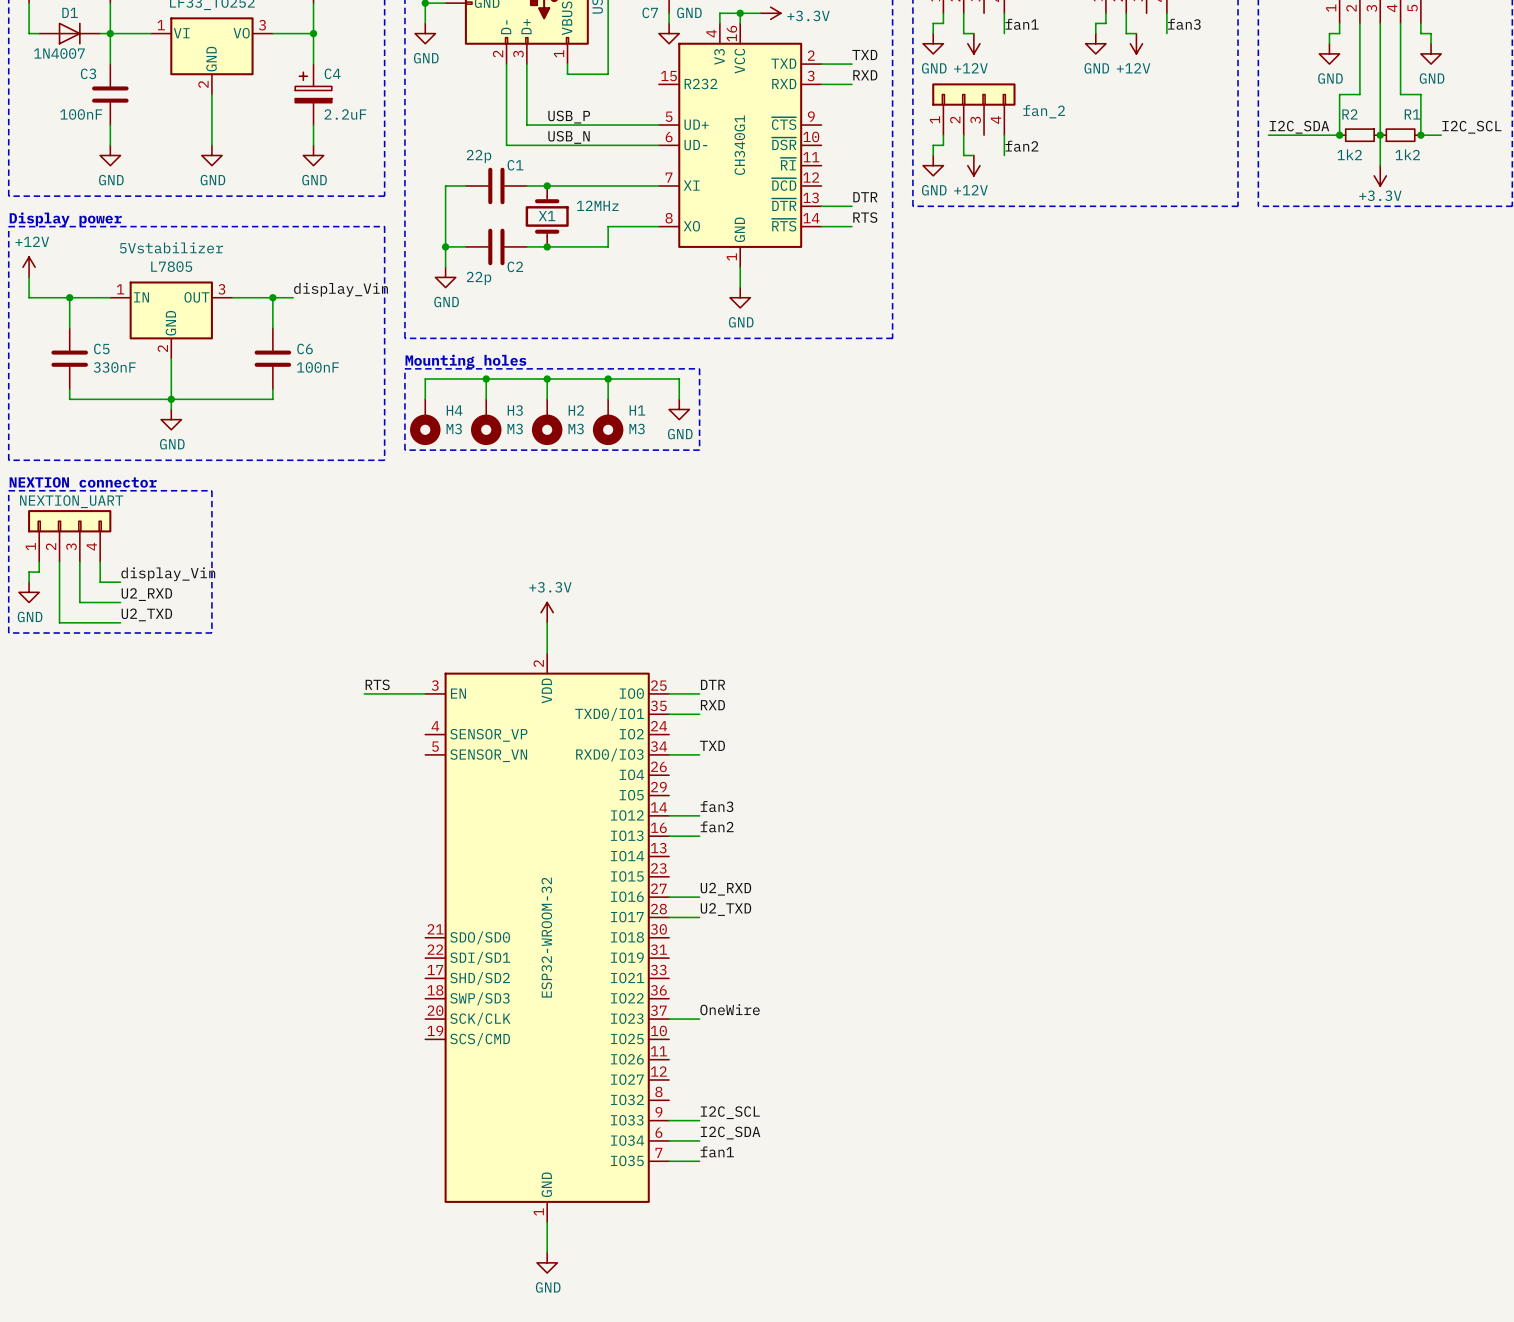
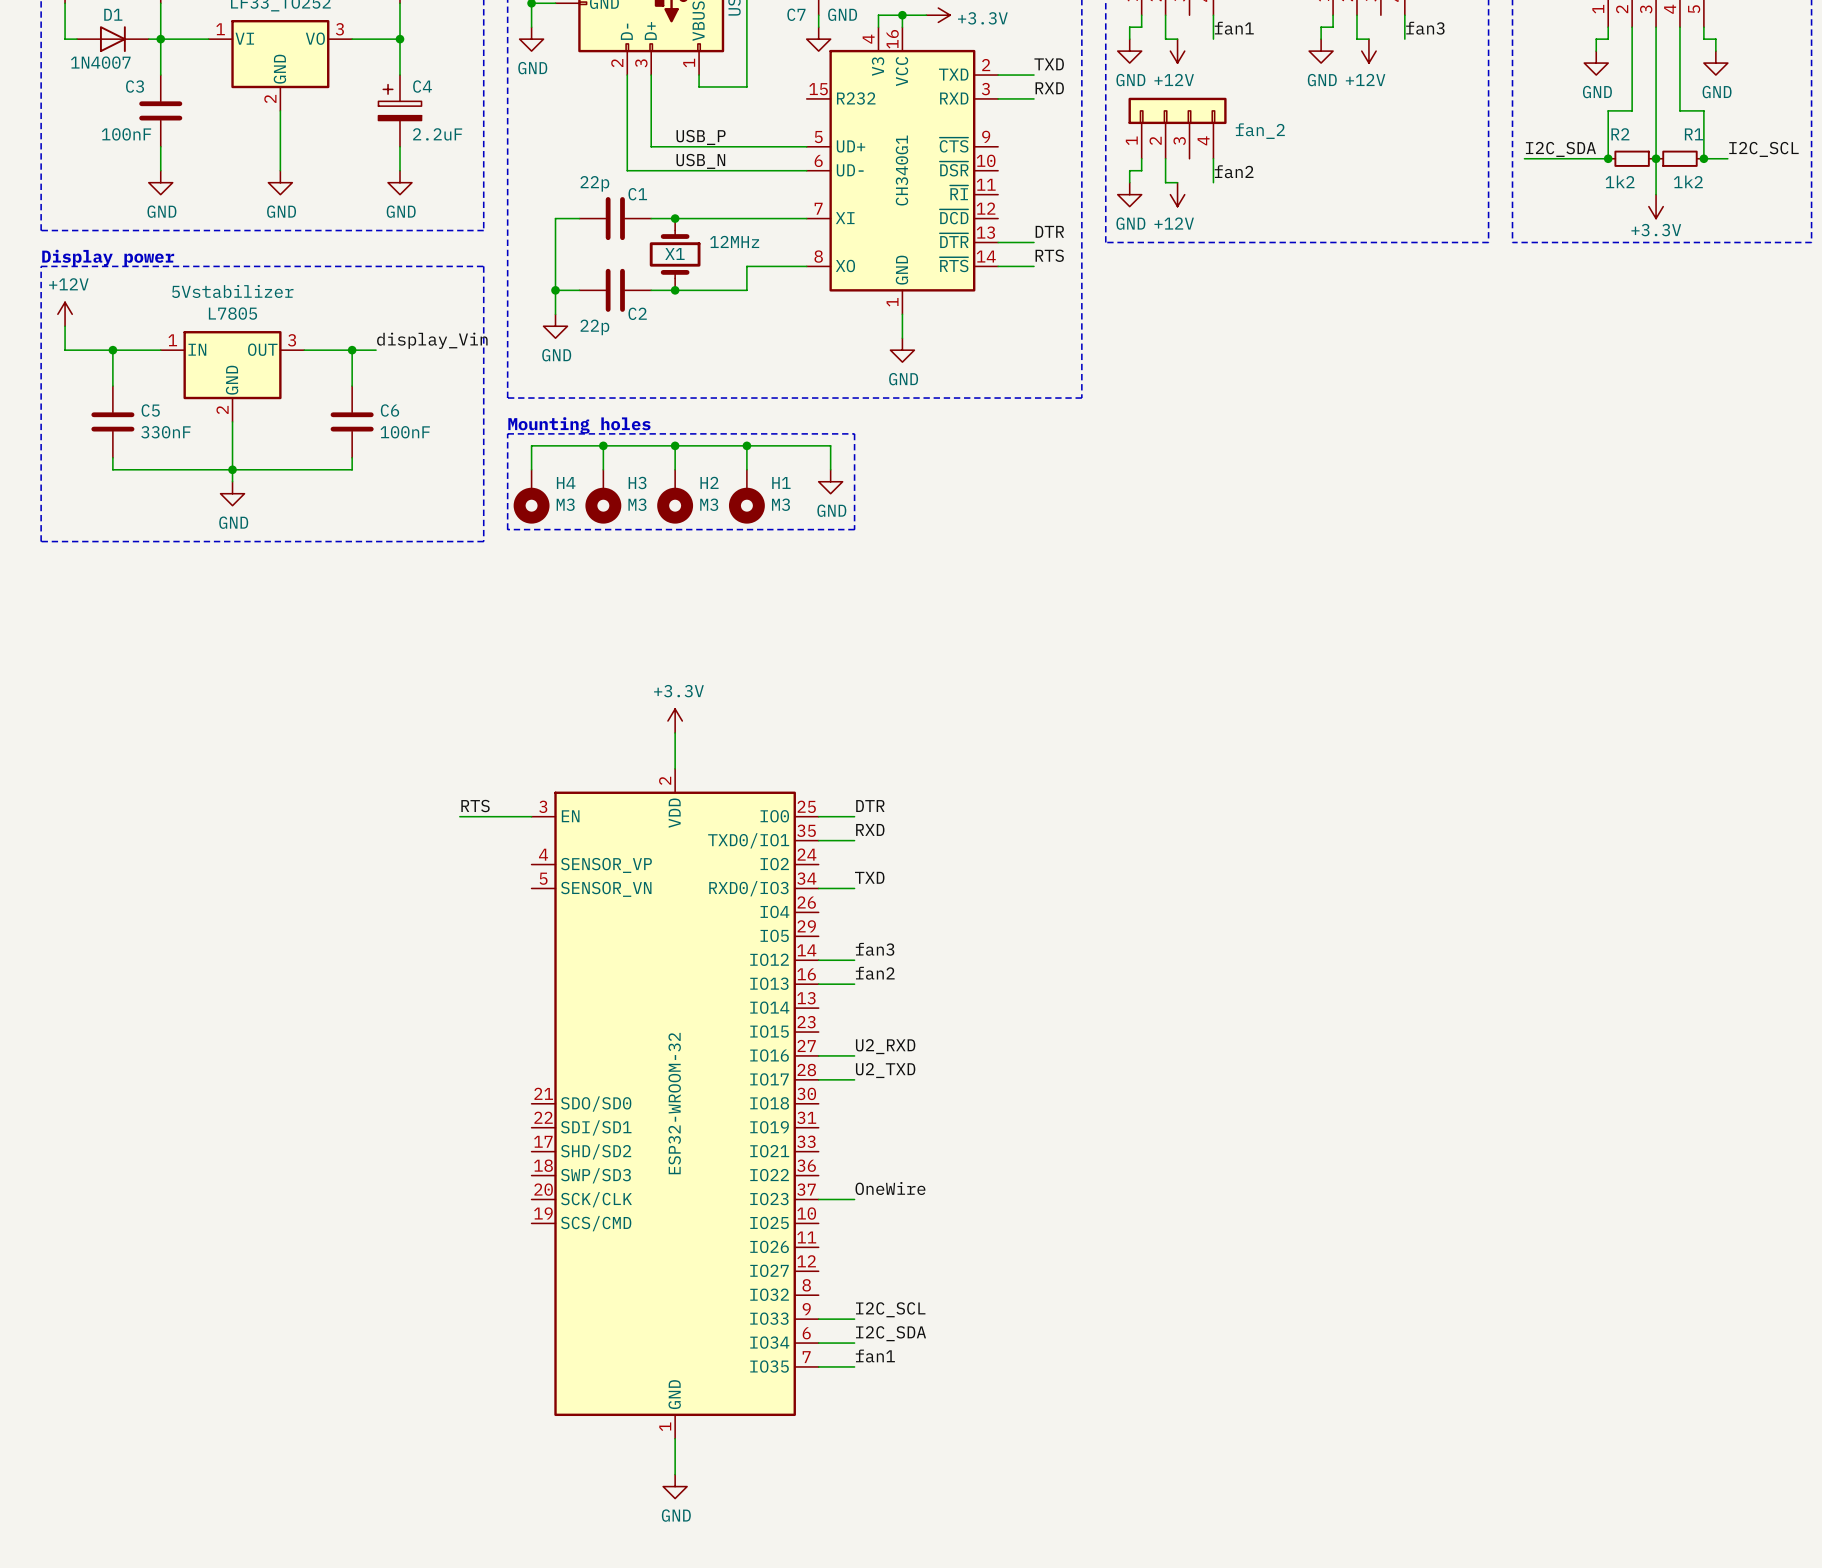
text: NEXTION connector (83, 482) -> none
line: (8, 490) (8, 632) (211, 632) (211, 490) (8, 490) -> none
NEXTION_UART: (69, 535) -> none
wire: (39, 561) (39, 572) (29, 572) (29, 582) -> none
wire: (59, 561) (59, 622) (120, 622) -> none
wire: (79, 561) (79, 602) (120, 602) -> none
wire: (100, 561) (100, 582) (120, 582) -> none
label: display_Vin (168, 574) -> none
power symbol: GND (29, 592) -> none
label: U2_RXD (146, 594) -> none
label: U2_TXD (146, 614) -> none

